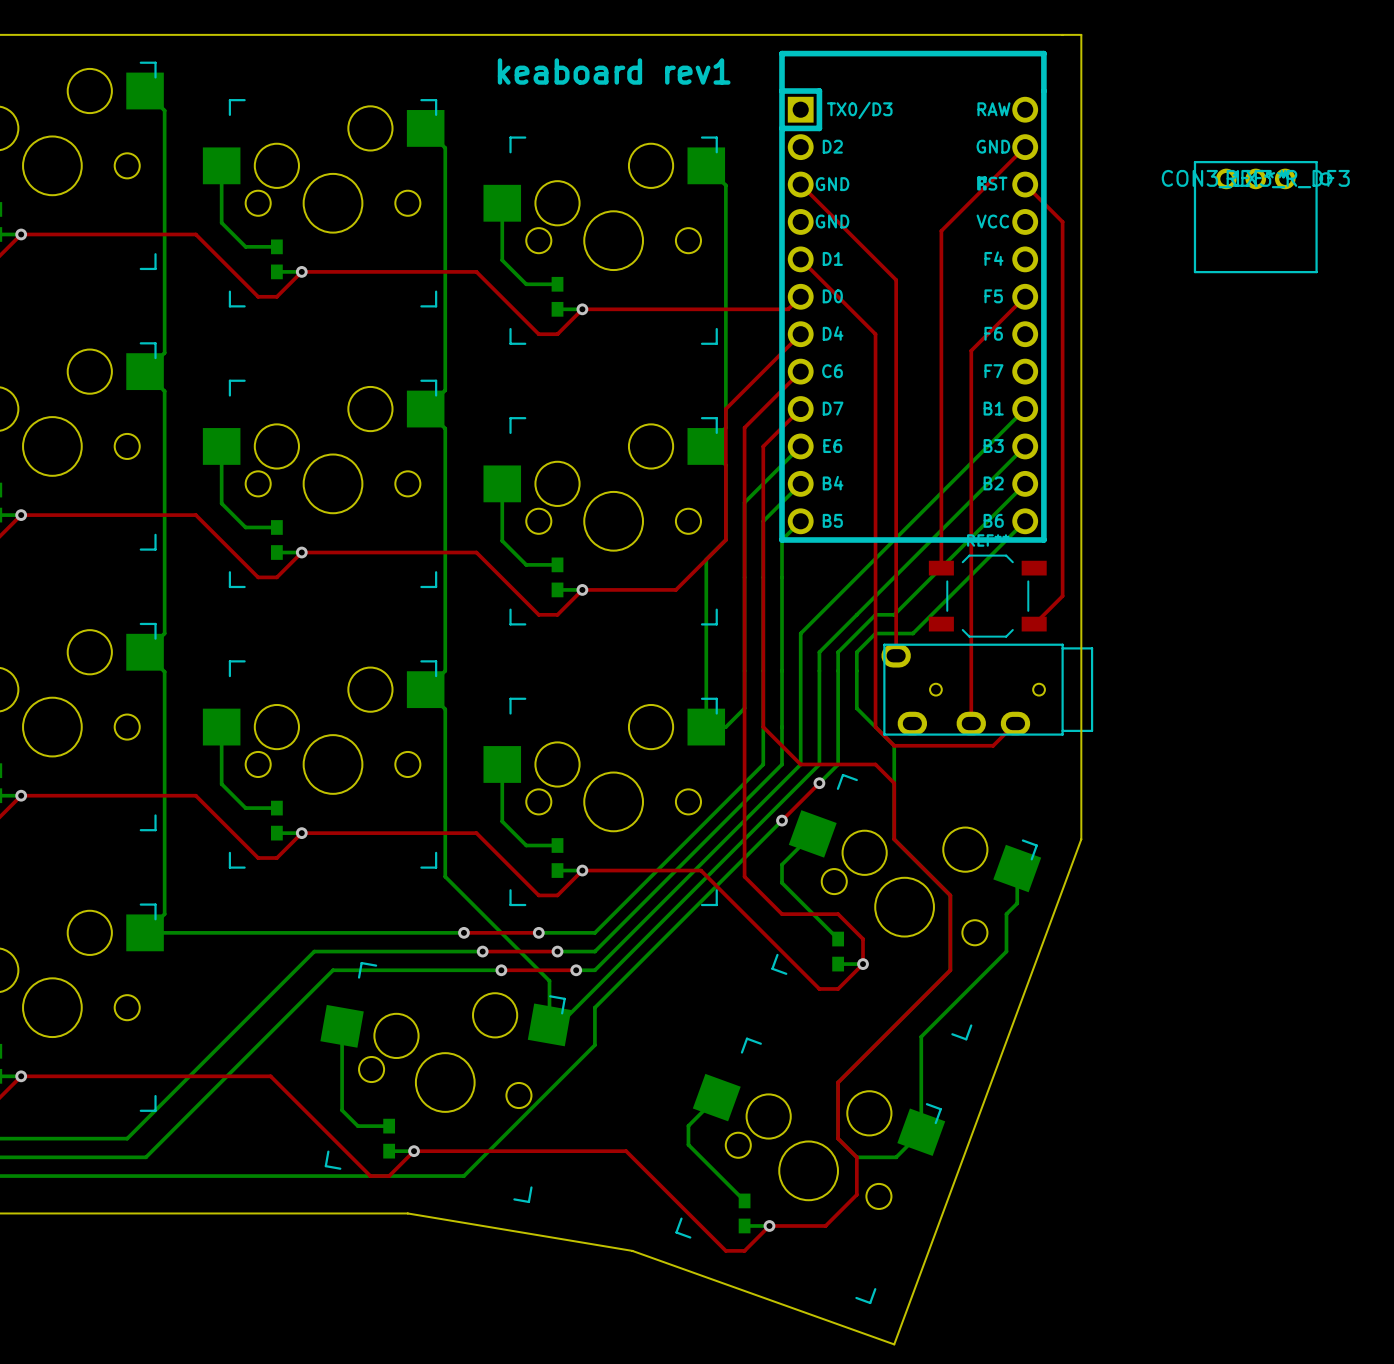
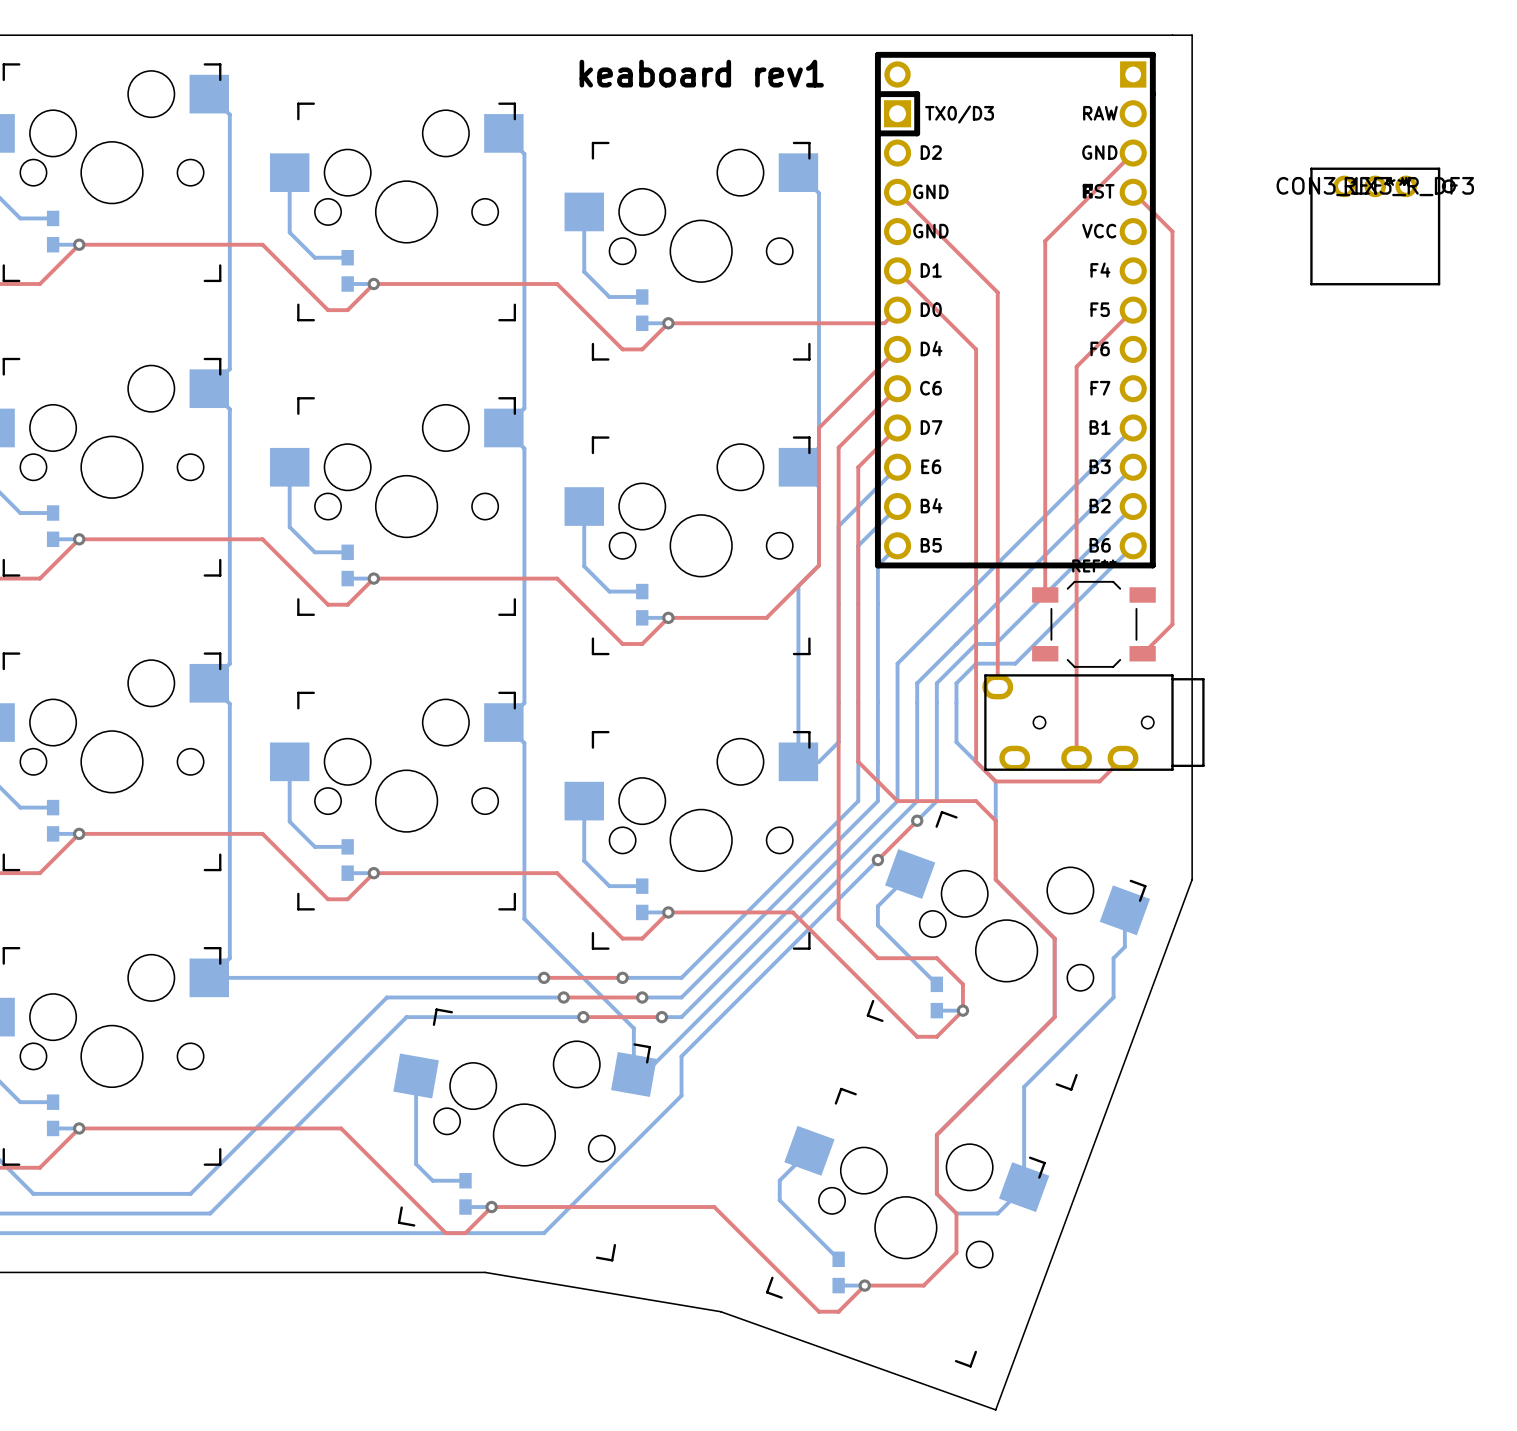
part: none -> (897, 74)
part: none -> (1133, 74)

